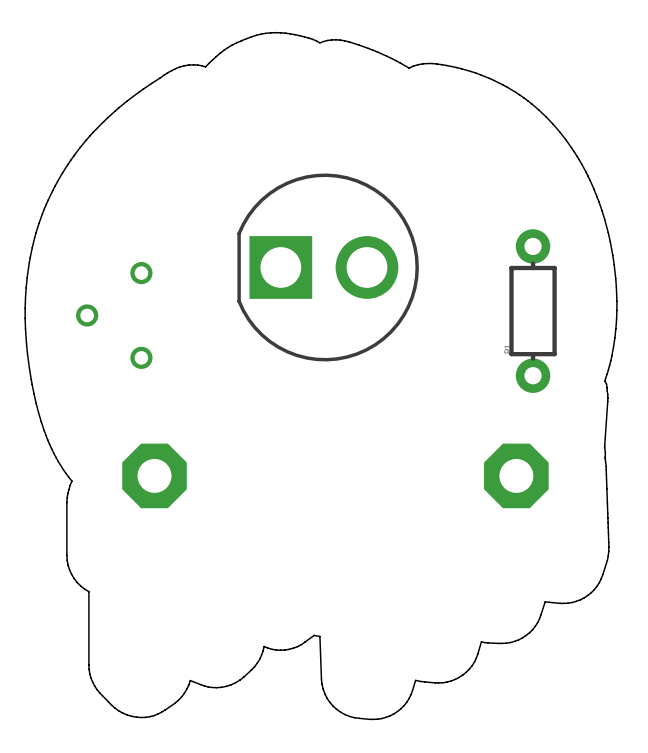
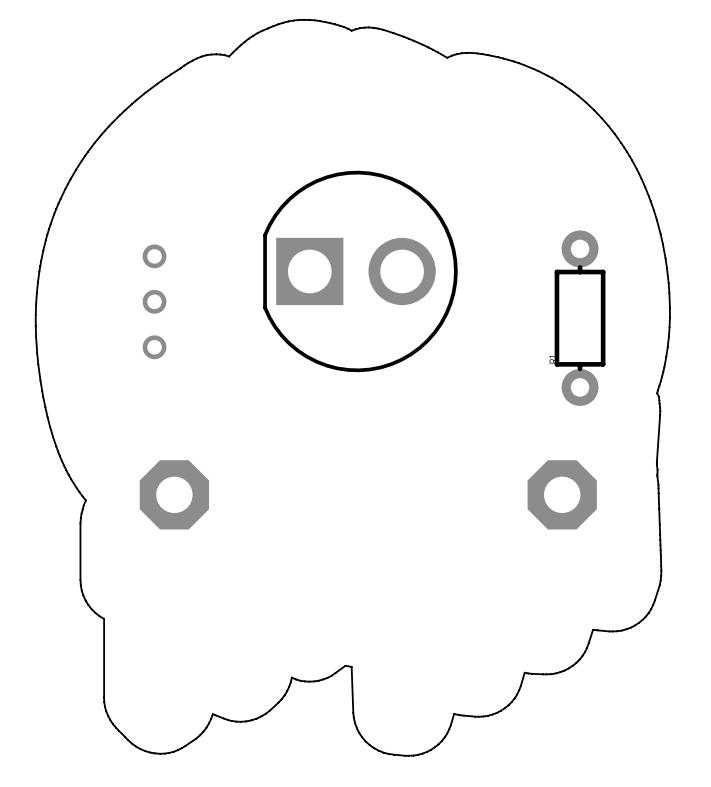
part: none -> (154, 301)
part: (114, 315) -> none

